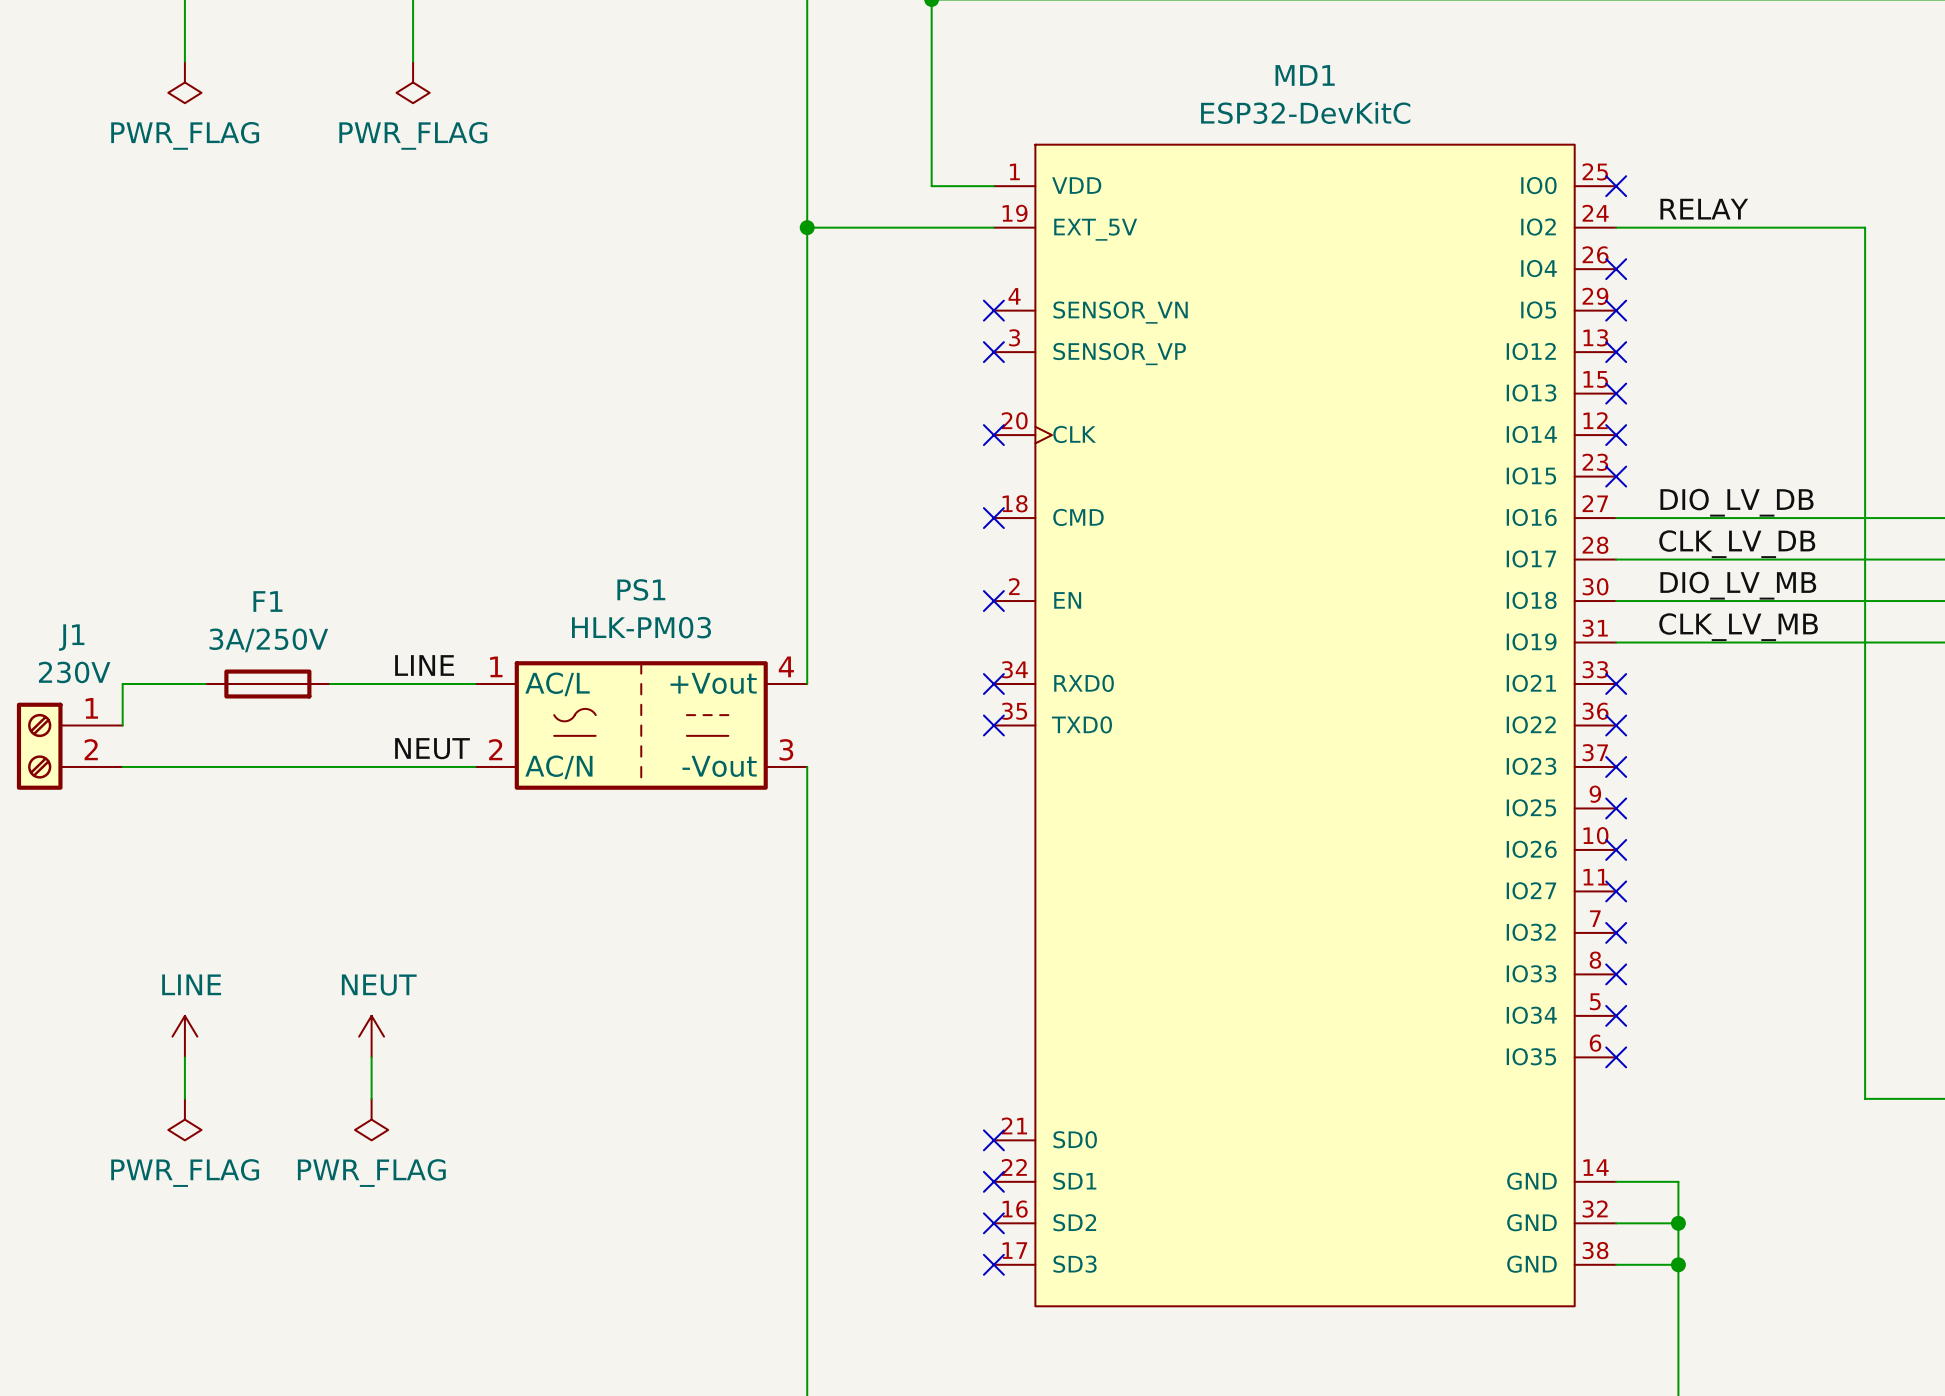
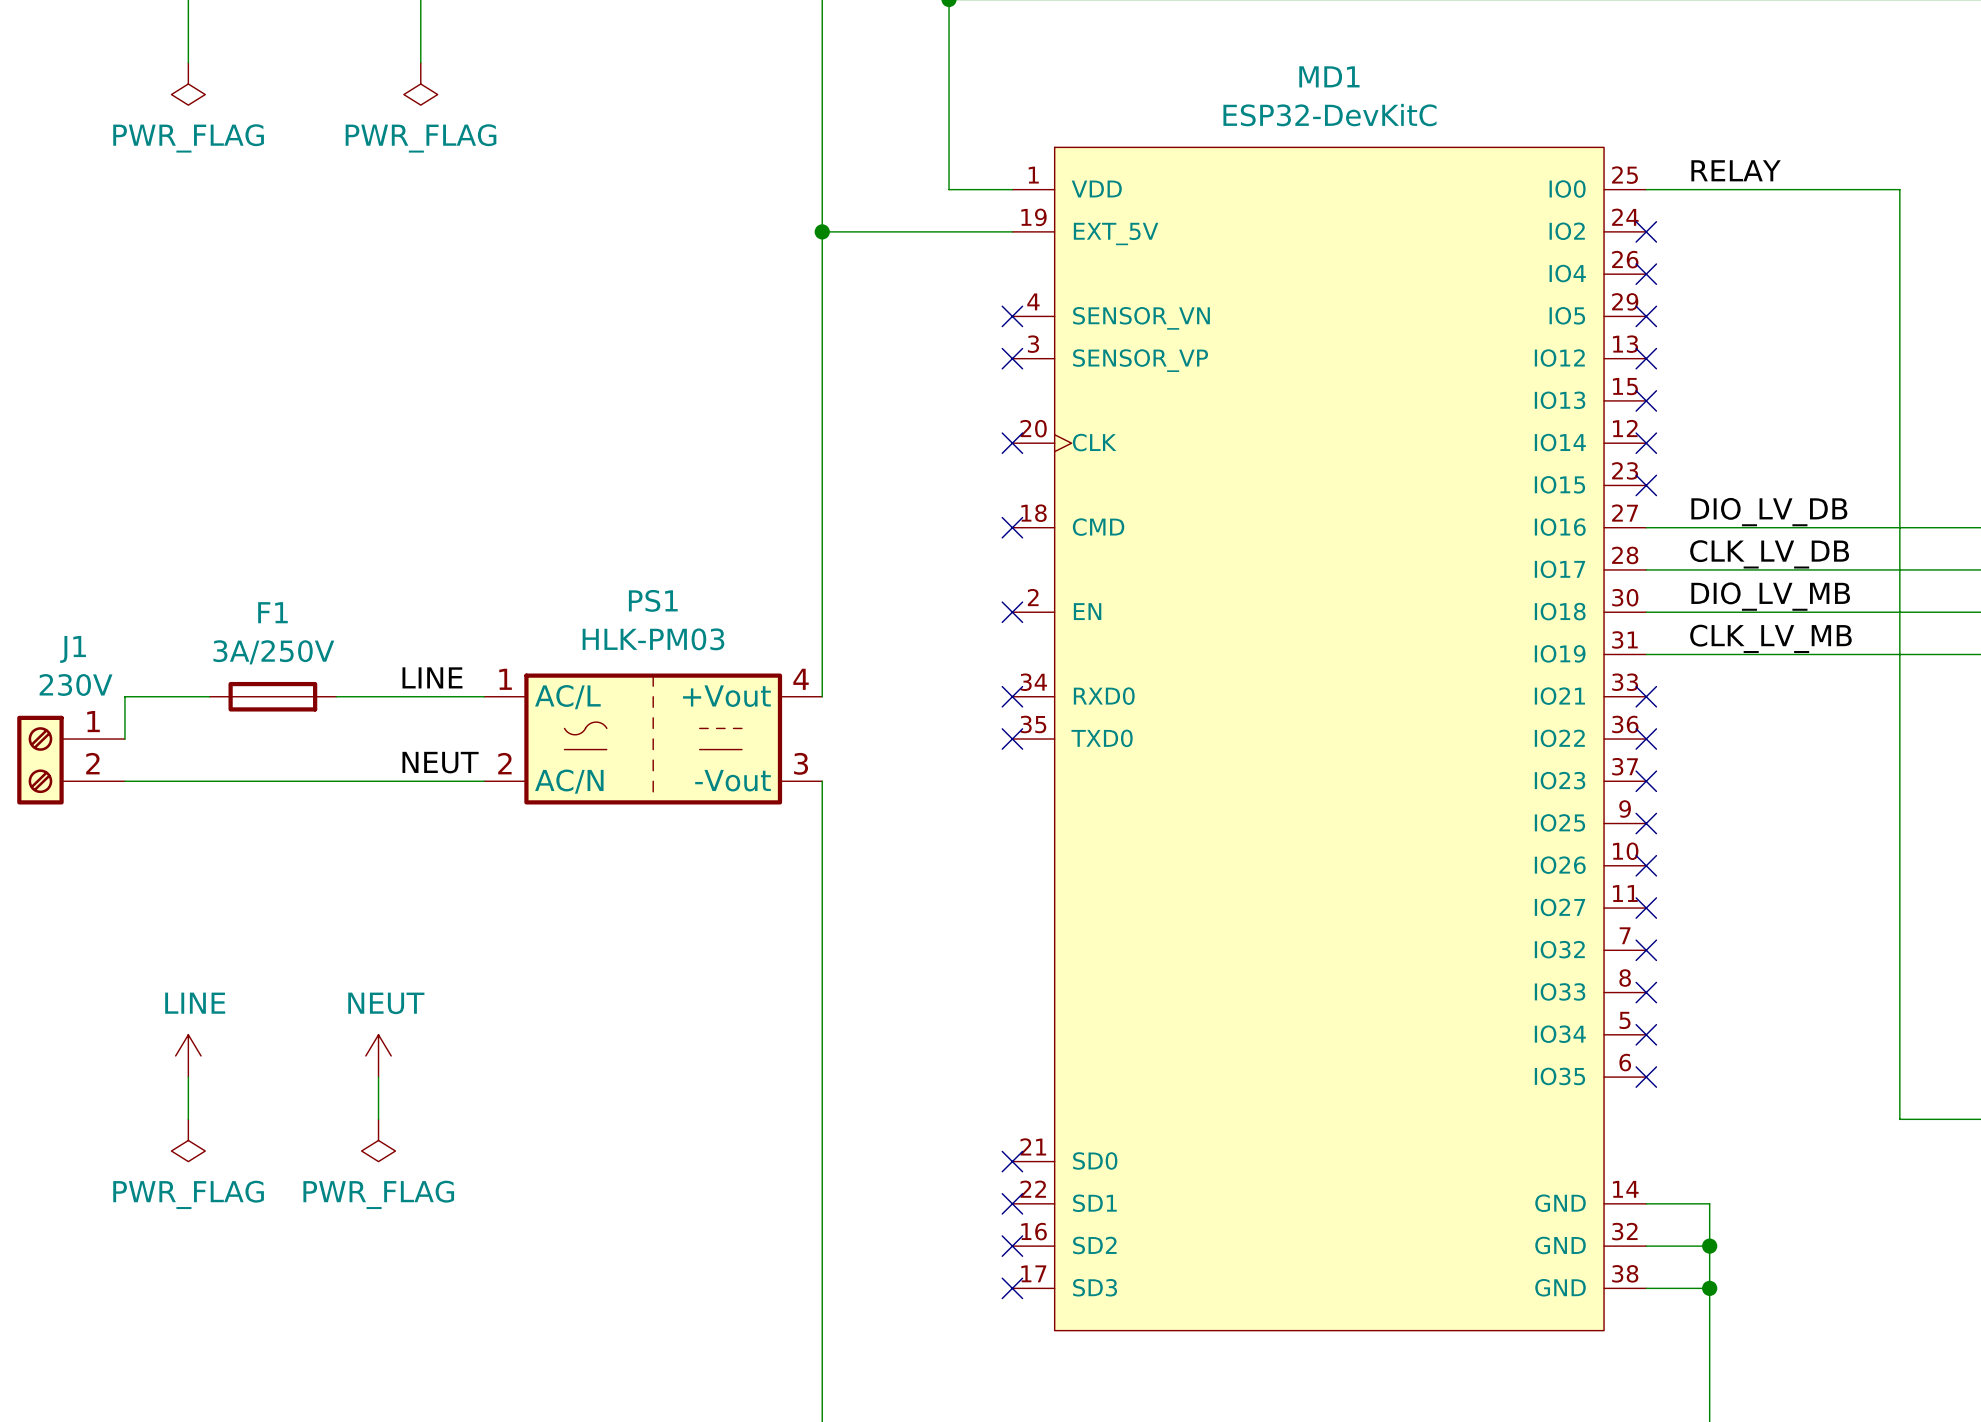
no-connect mark position: (1616, 186) -> (1646, 231)
label position: RELAY (1704, 209) -> RELAY (1736, 170)
wire: (1616, 227) (1865, 227) -> (1646, 189) (1899, 189) (1899, 231)

